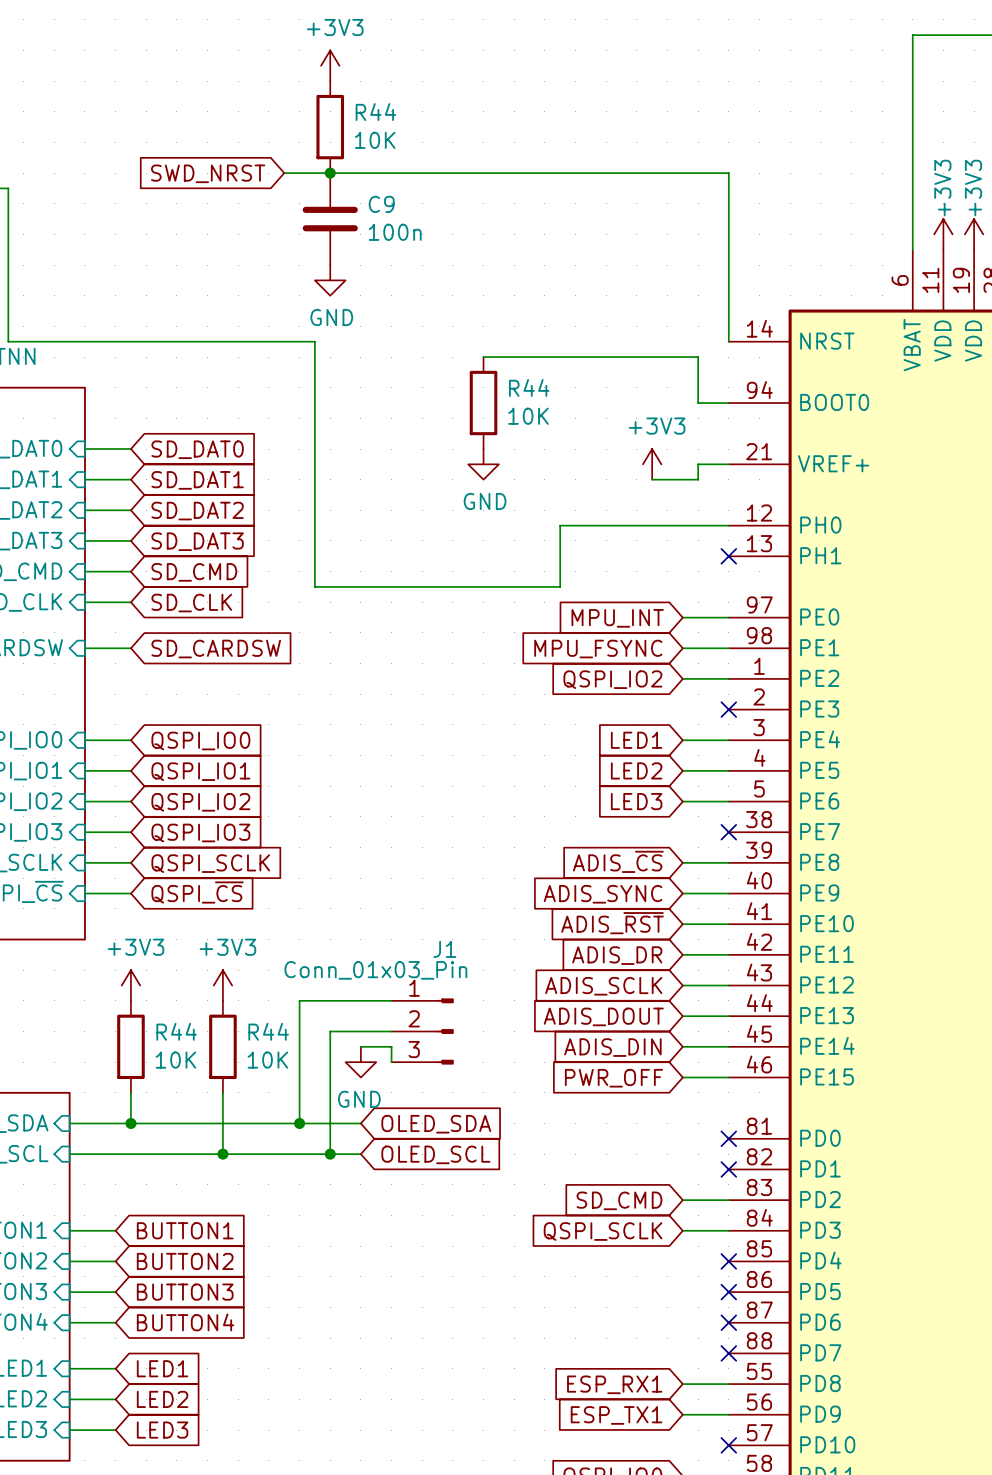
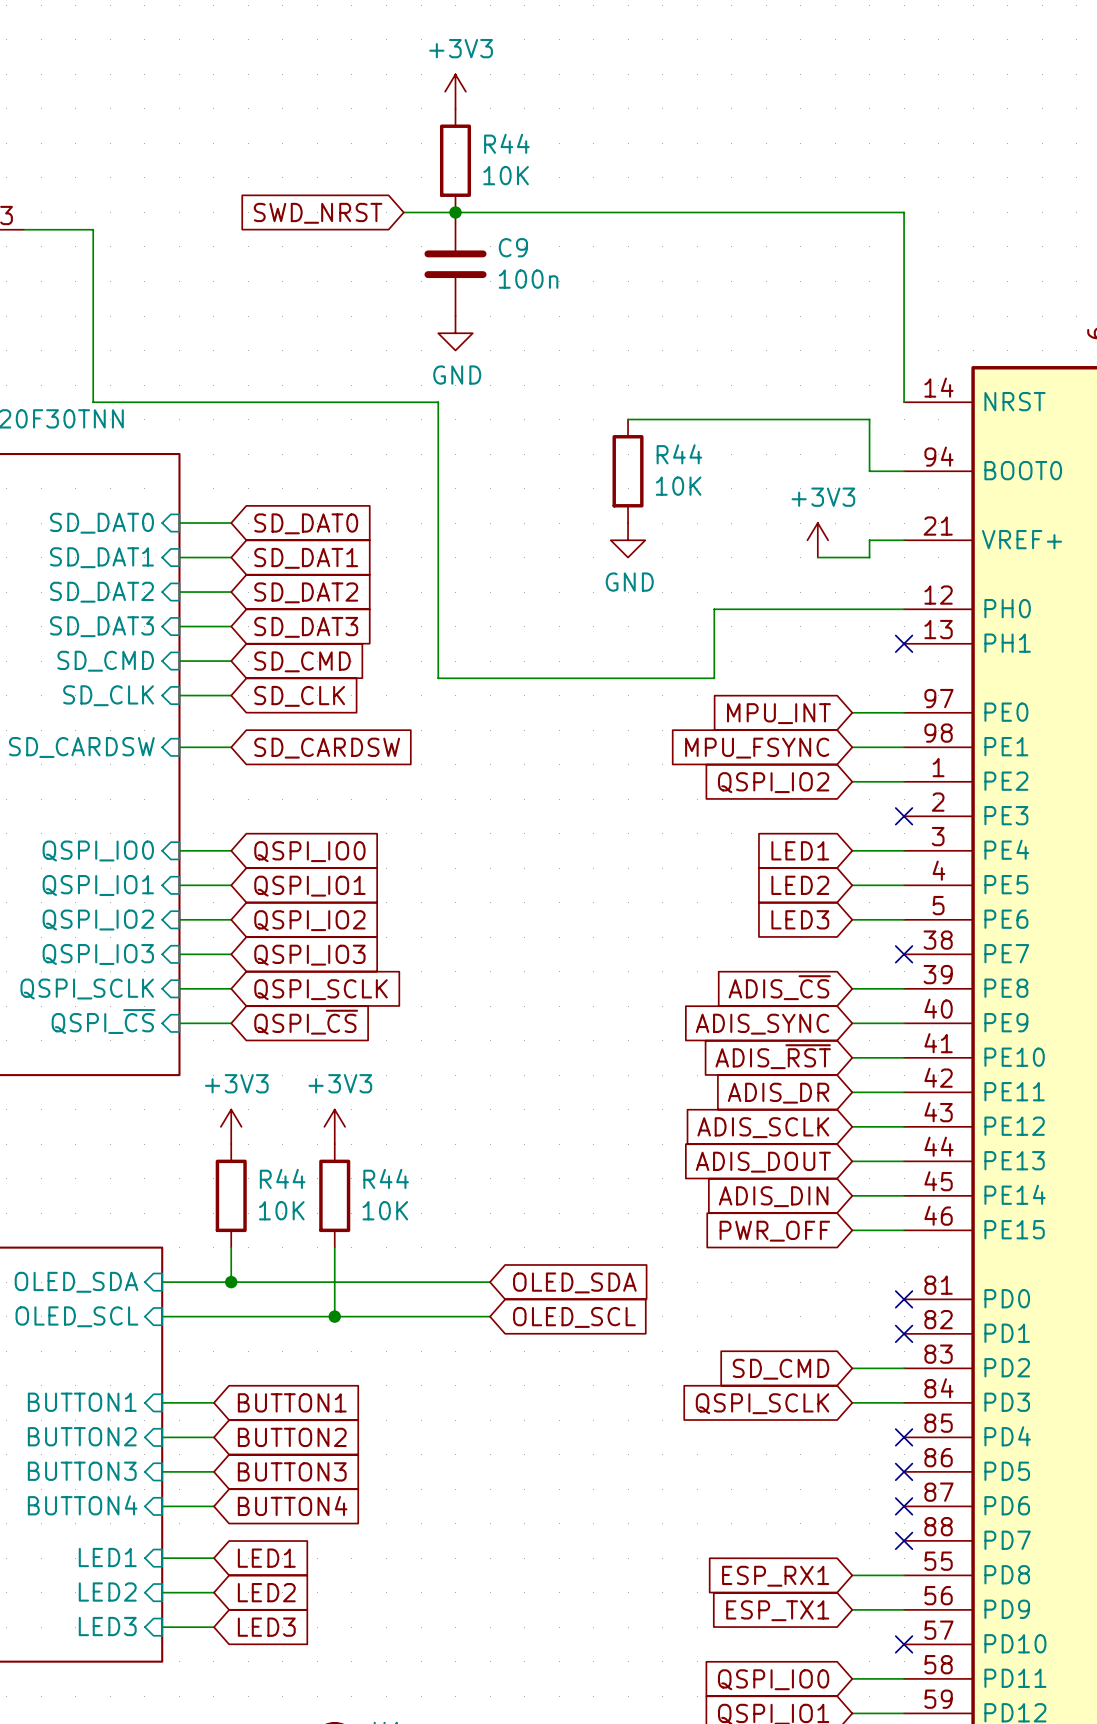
wire: (391, 1000) (299, 1000) (299, 1123) -> none
wire: (391, 1031) (330, 1031) (330, 1154) -> none
J1: Conn_01x03_Pin (422, 1031) -> none
wire: (360, 1046) (391, 1046) (391, 1062) -> none
power symbol: GND (360, 1062) -> none
junction: (299, 1123) -> none
junction: (330, 1154) -> none

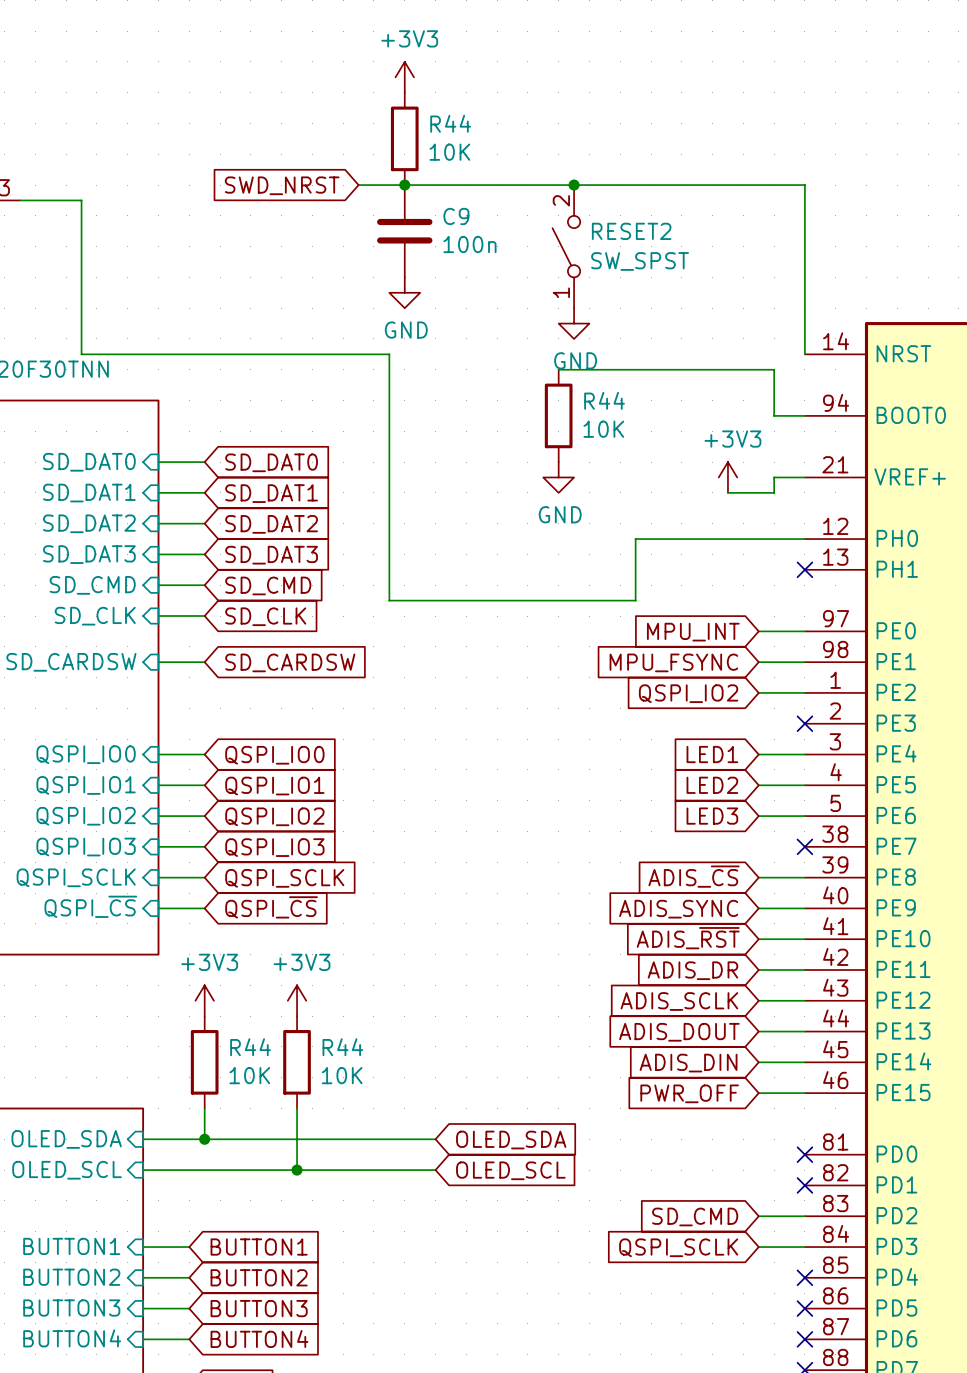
junction: none -> (574, 185)
RESET2: none -> SW_SPST (566, 246)
power symbol: none -> GND (574, 323)

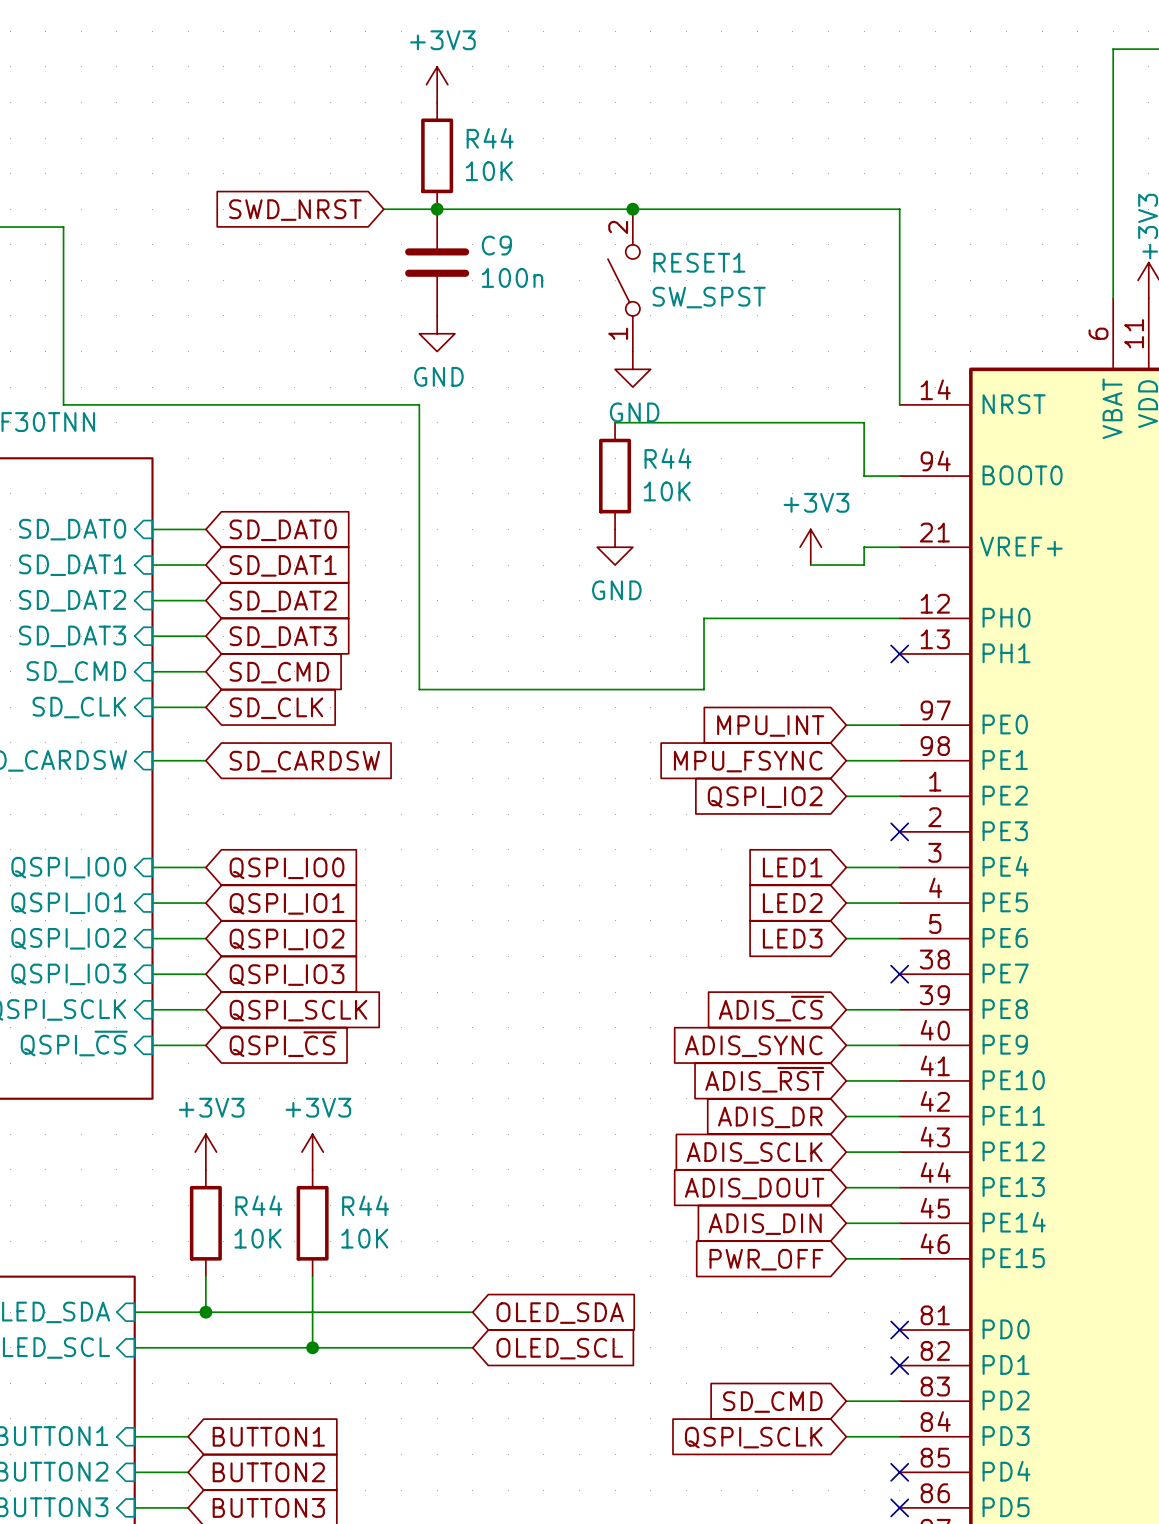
RESET2 name: RESET2 (631, 231) -> RESET1 (699, 262)

